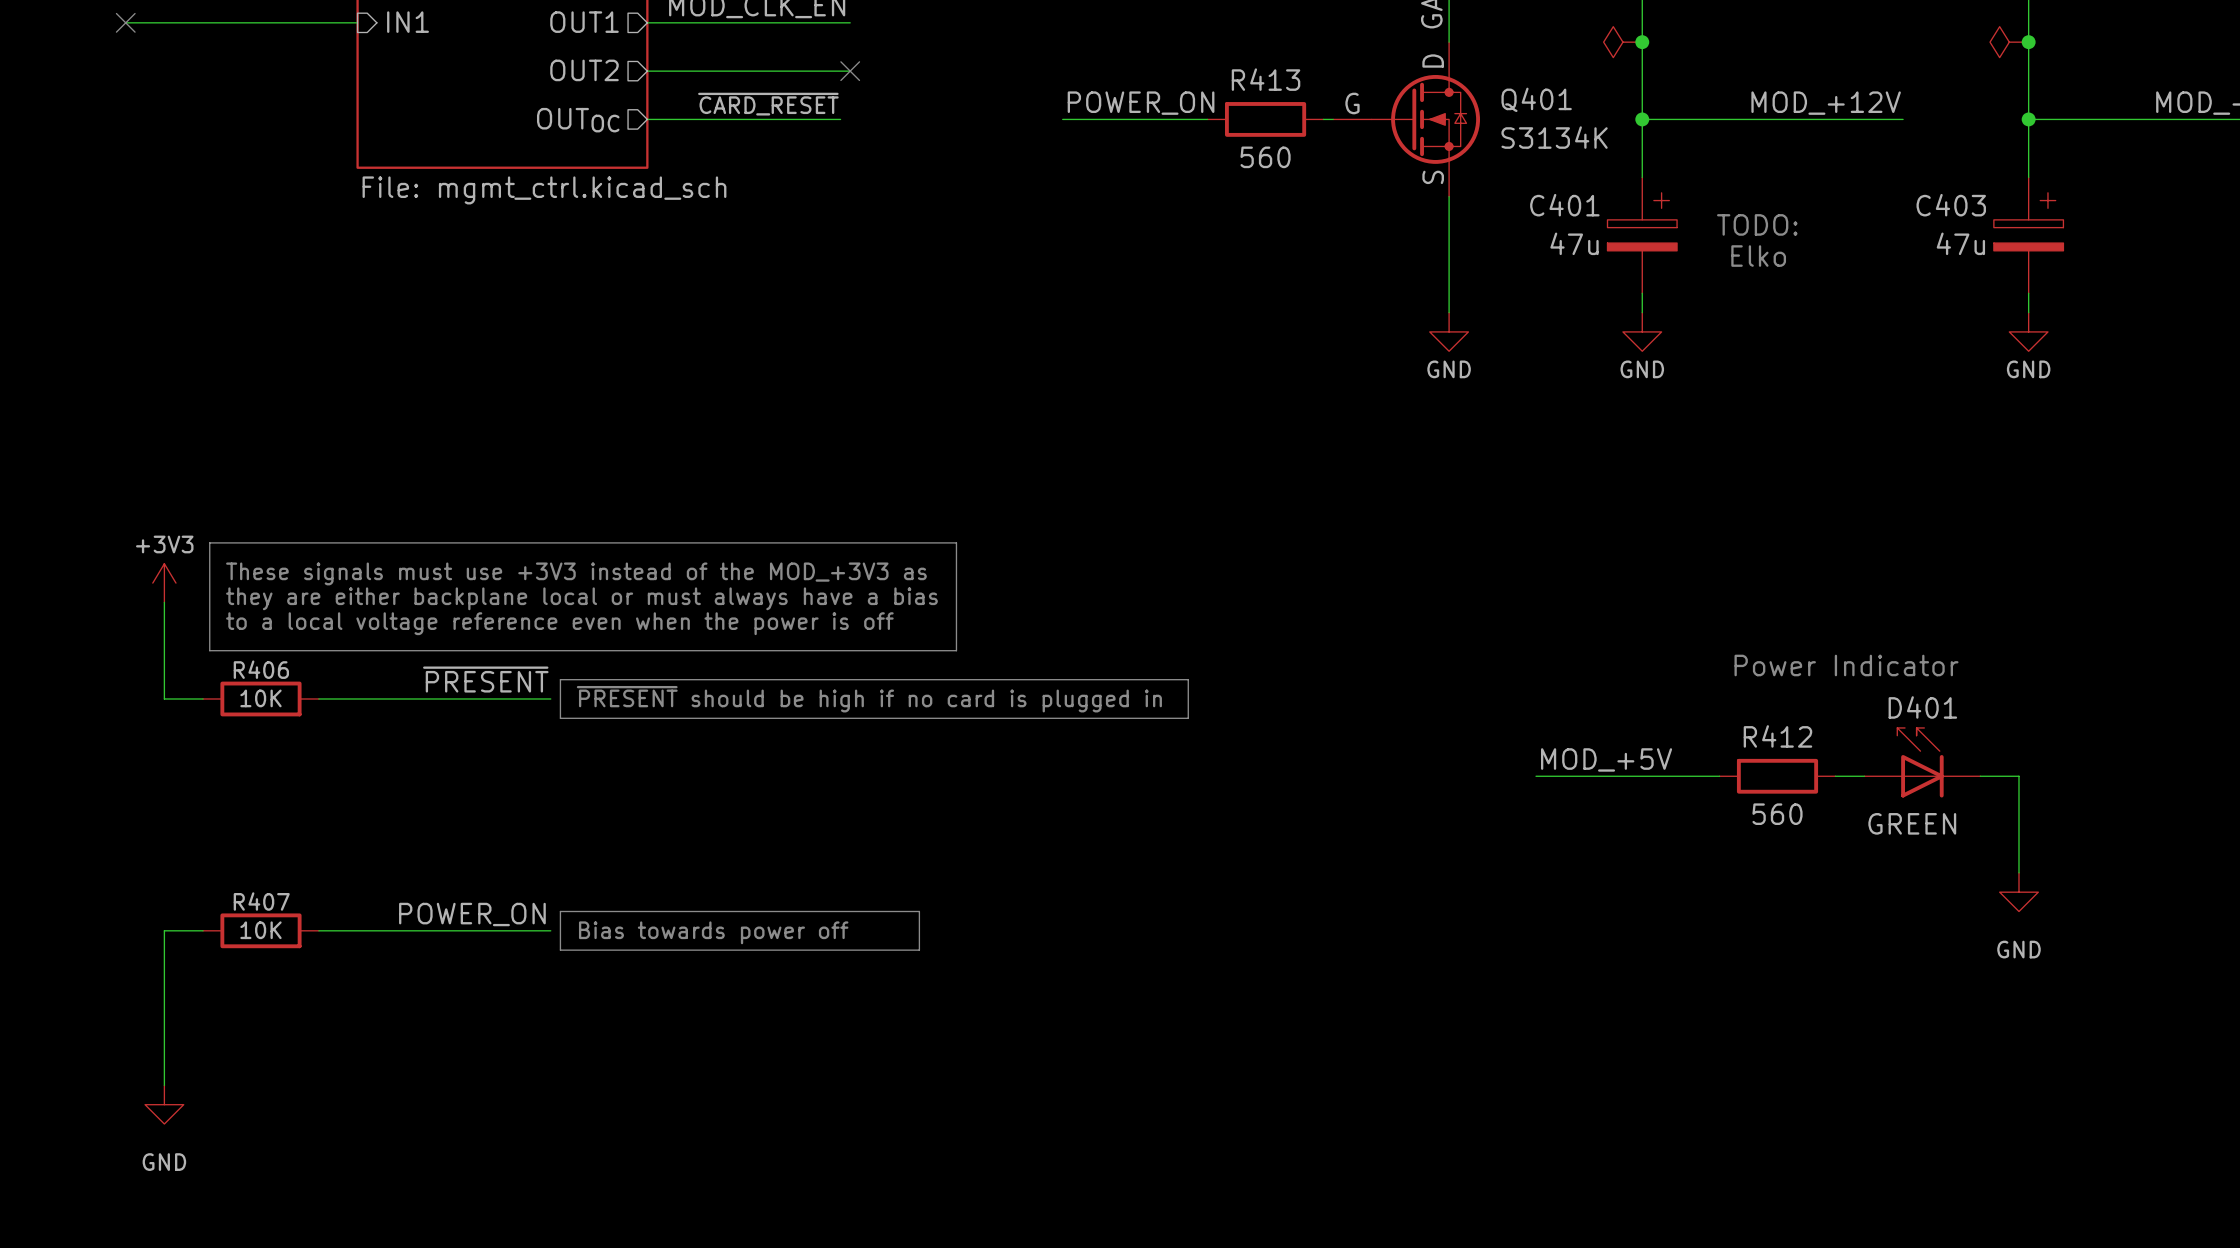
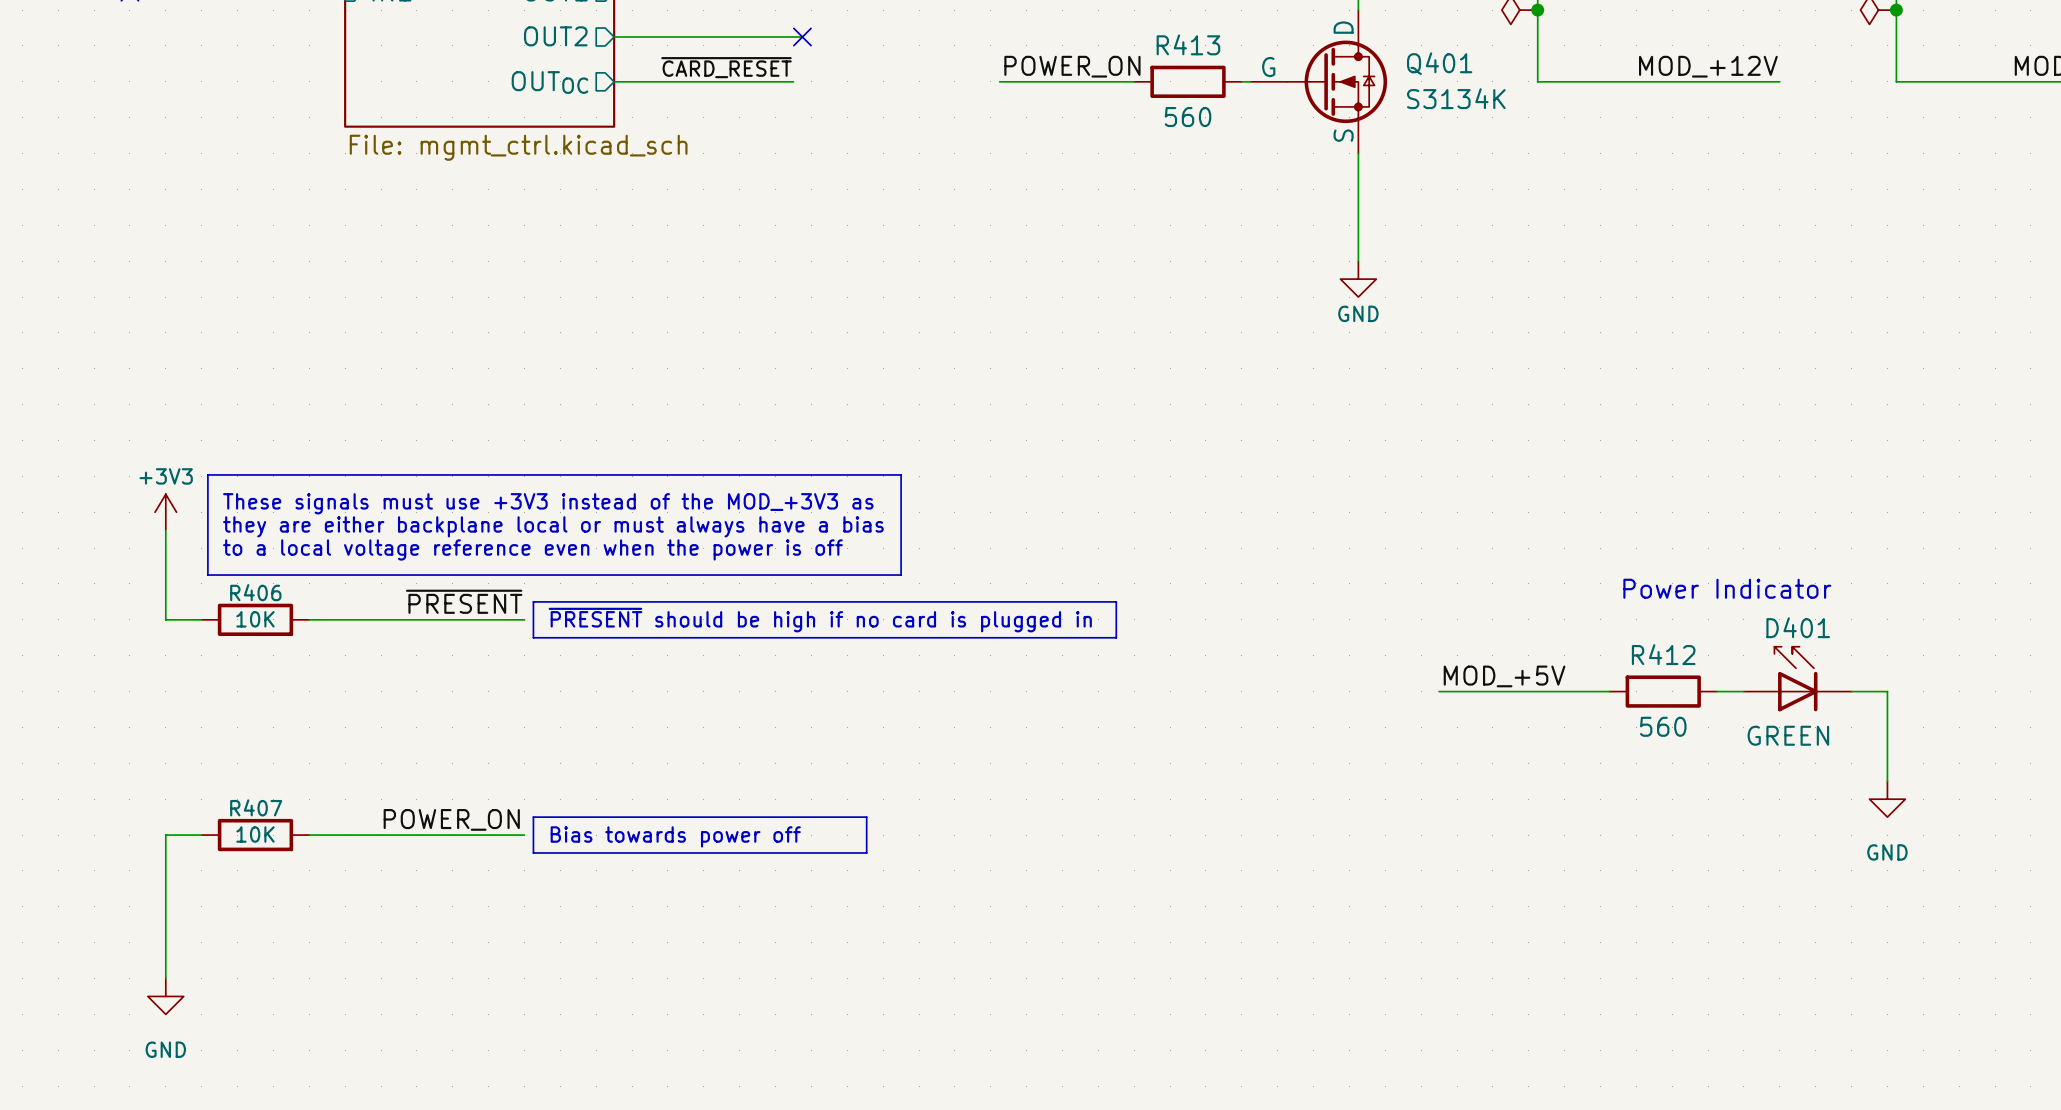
wire: (1642, 119) (1642, 177) -> none
junction: (1642, 119) -> none
wire: (2028, 119) (2028, 177) -> none
junction: (2028, 119) -> none
text: TODO: (1757, 224) -> none
C401: 47u (1642, 235) -> none
C403: 47u (2028, 235) -> none
text: Elko (1758, 256) -> none
wire: (1642, 293) (1642, 312) -> none
wire: (2028, 293) (2028, 312) -> none
power symbol: GND (1642, 331) -> none
power symbol: GND (2028, 331) -> none

